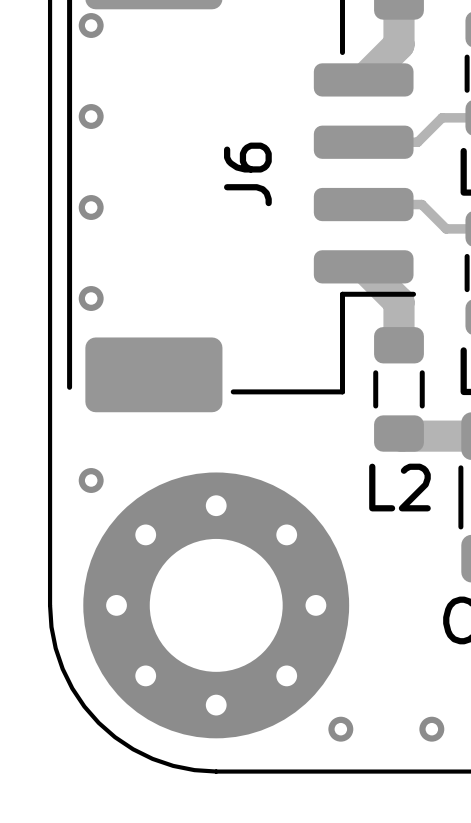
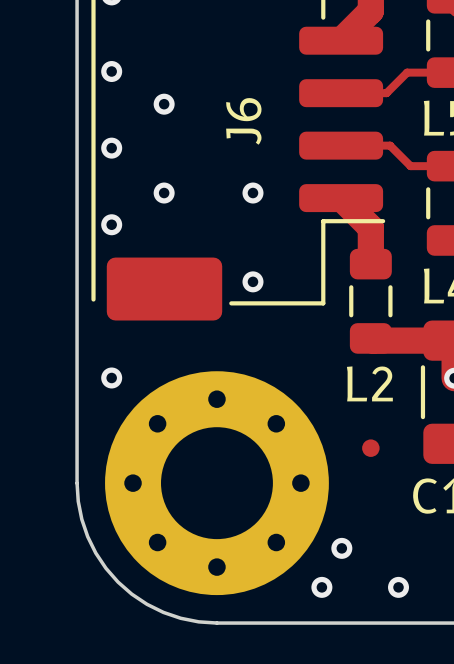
via: none -> (164, 104)
via: none -> (164, 193)
via: none -> (252, 193)
via: none -> (252, 281)
part: none -> (370, 448)
via: none -> (341, 548)

